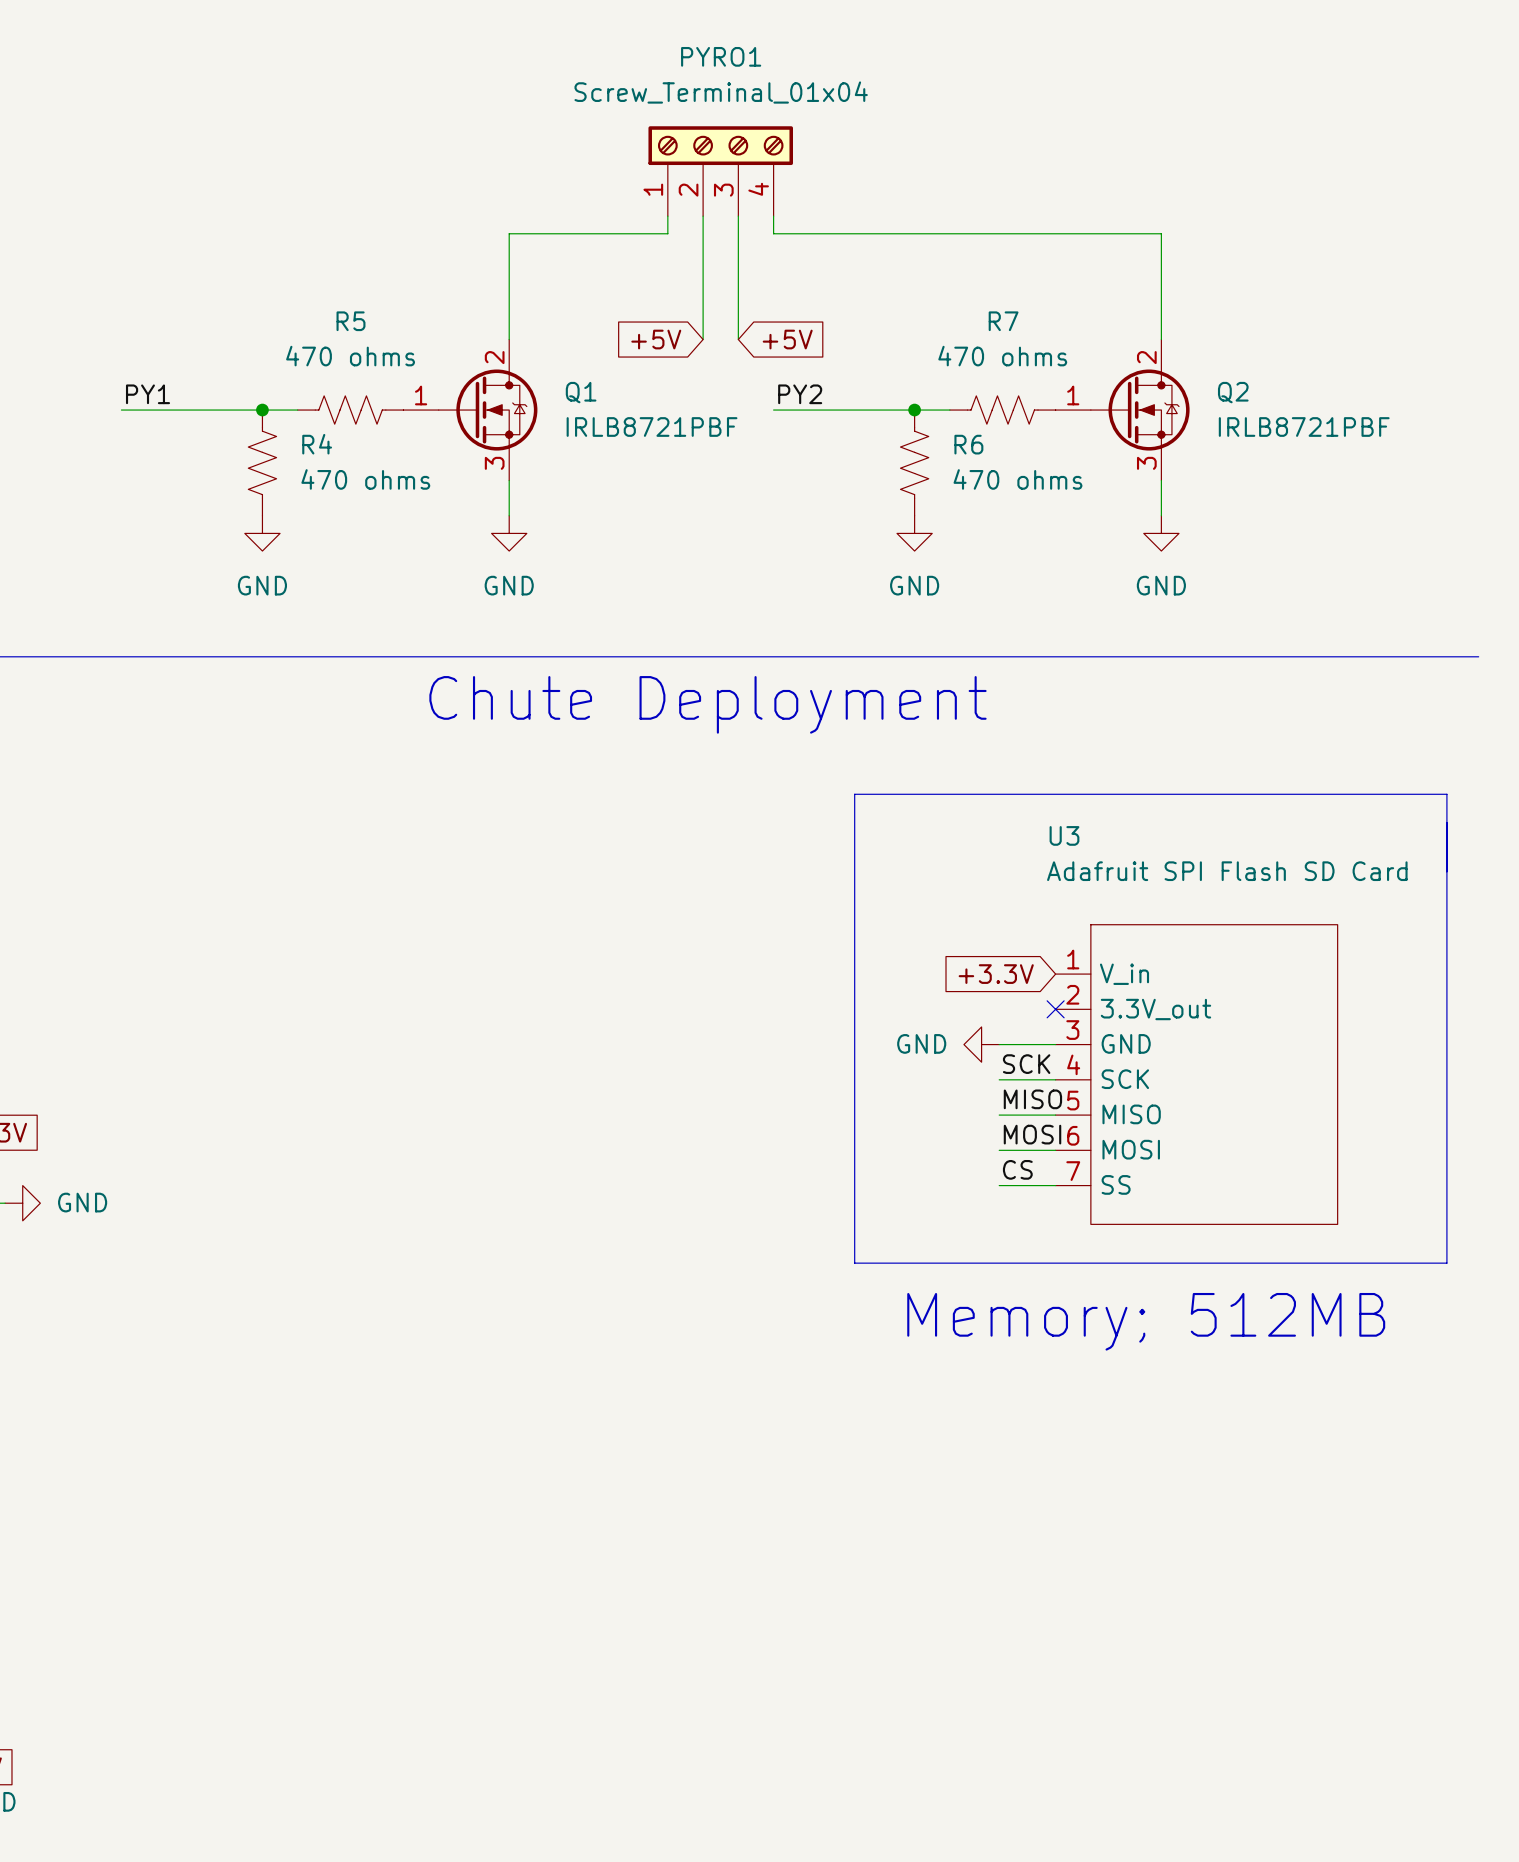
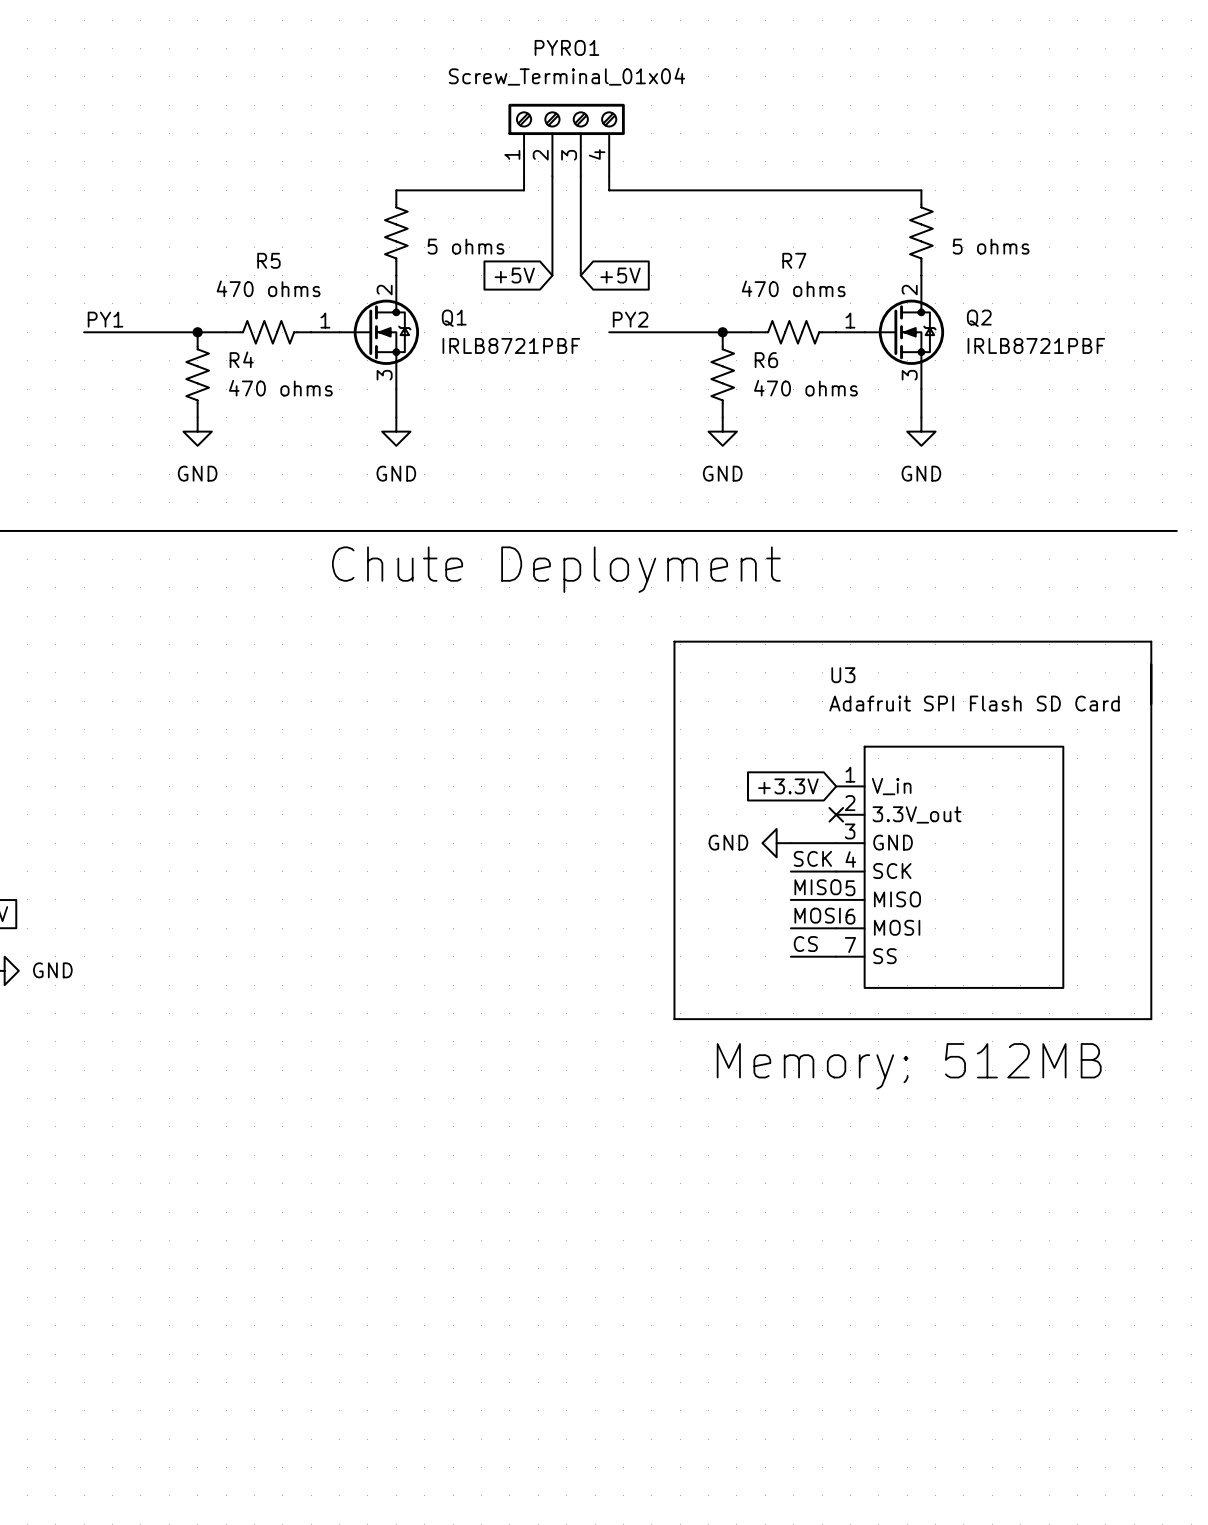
wire: (509, 233) (509, 339) -> none
wire: (1161, 233) (1161, 339) -> none
part: none -> 5 ohms (396, 232)
part: none -> 5 ohms (921, 232)

